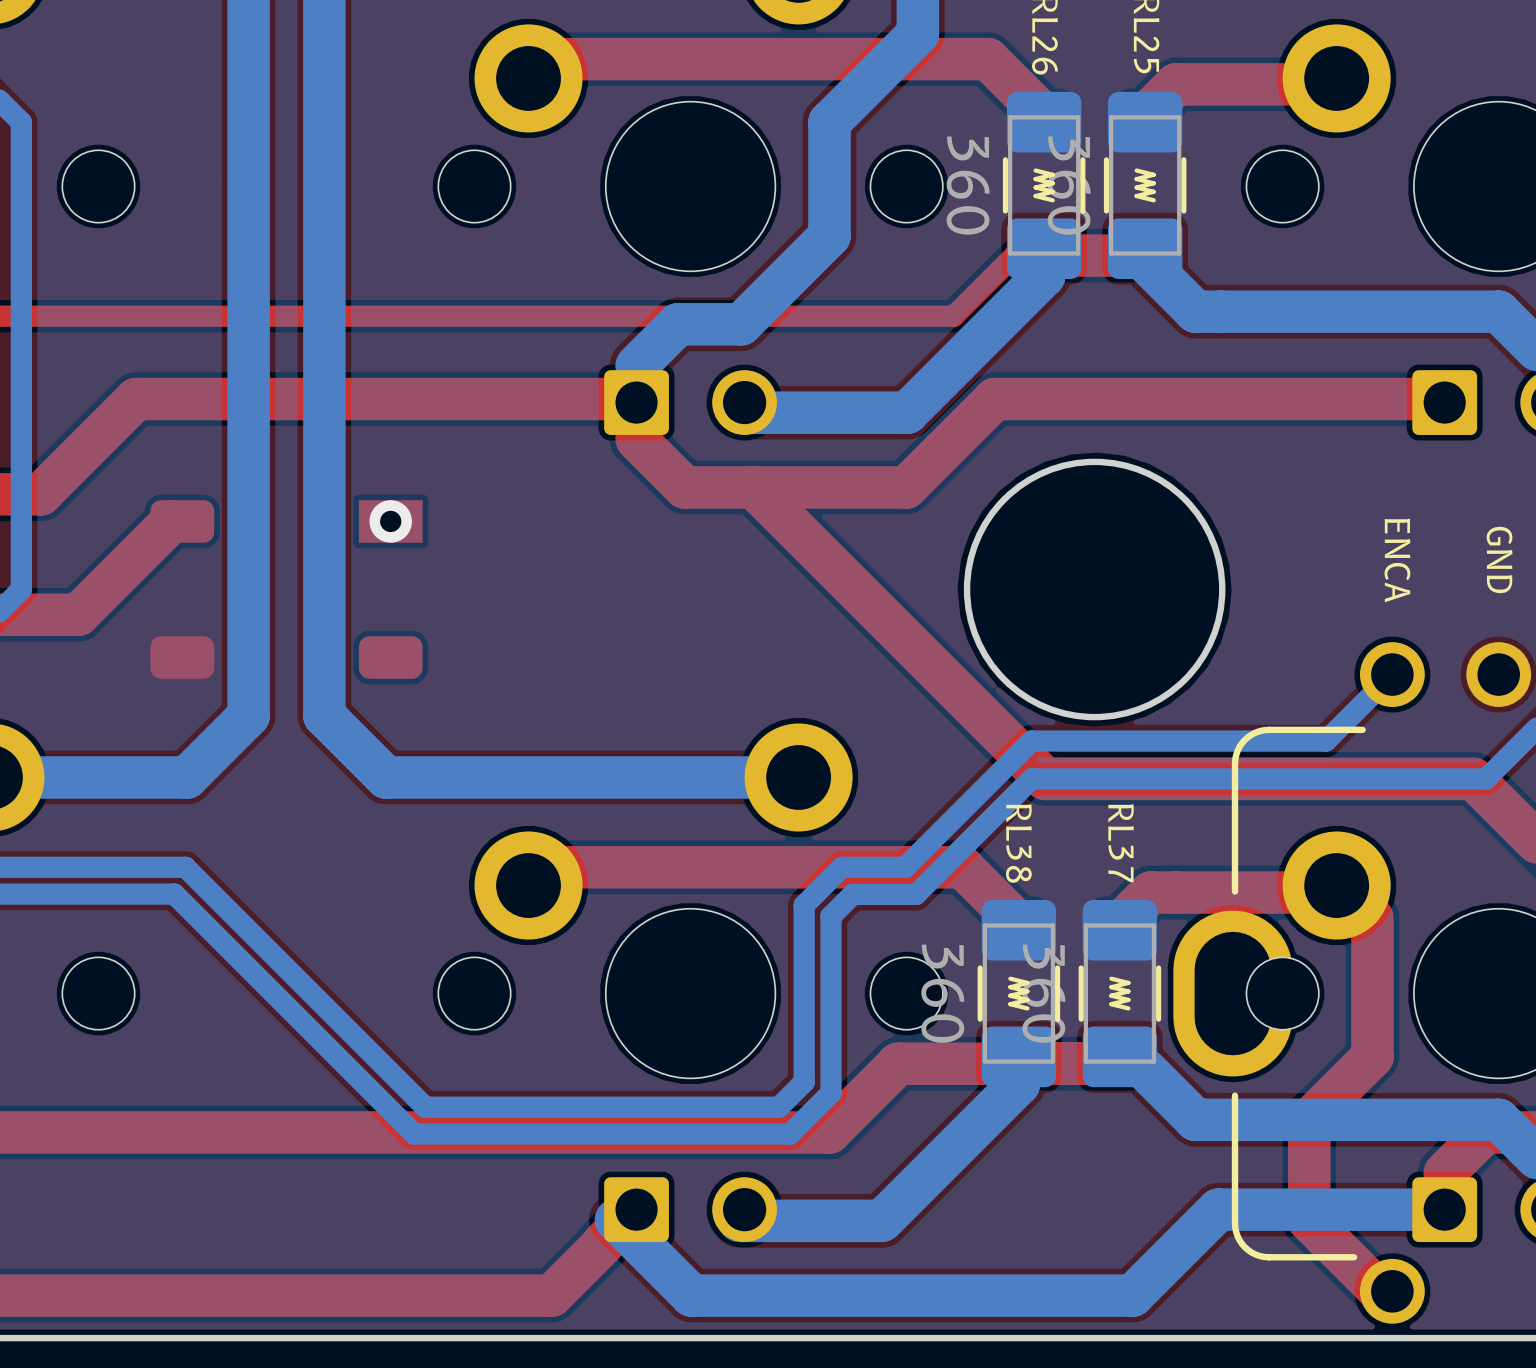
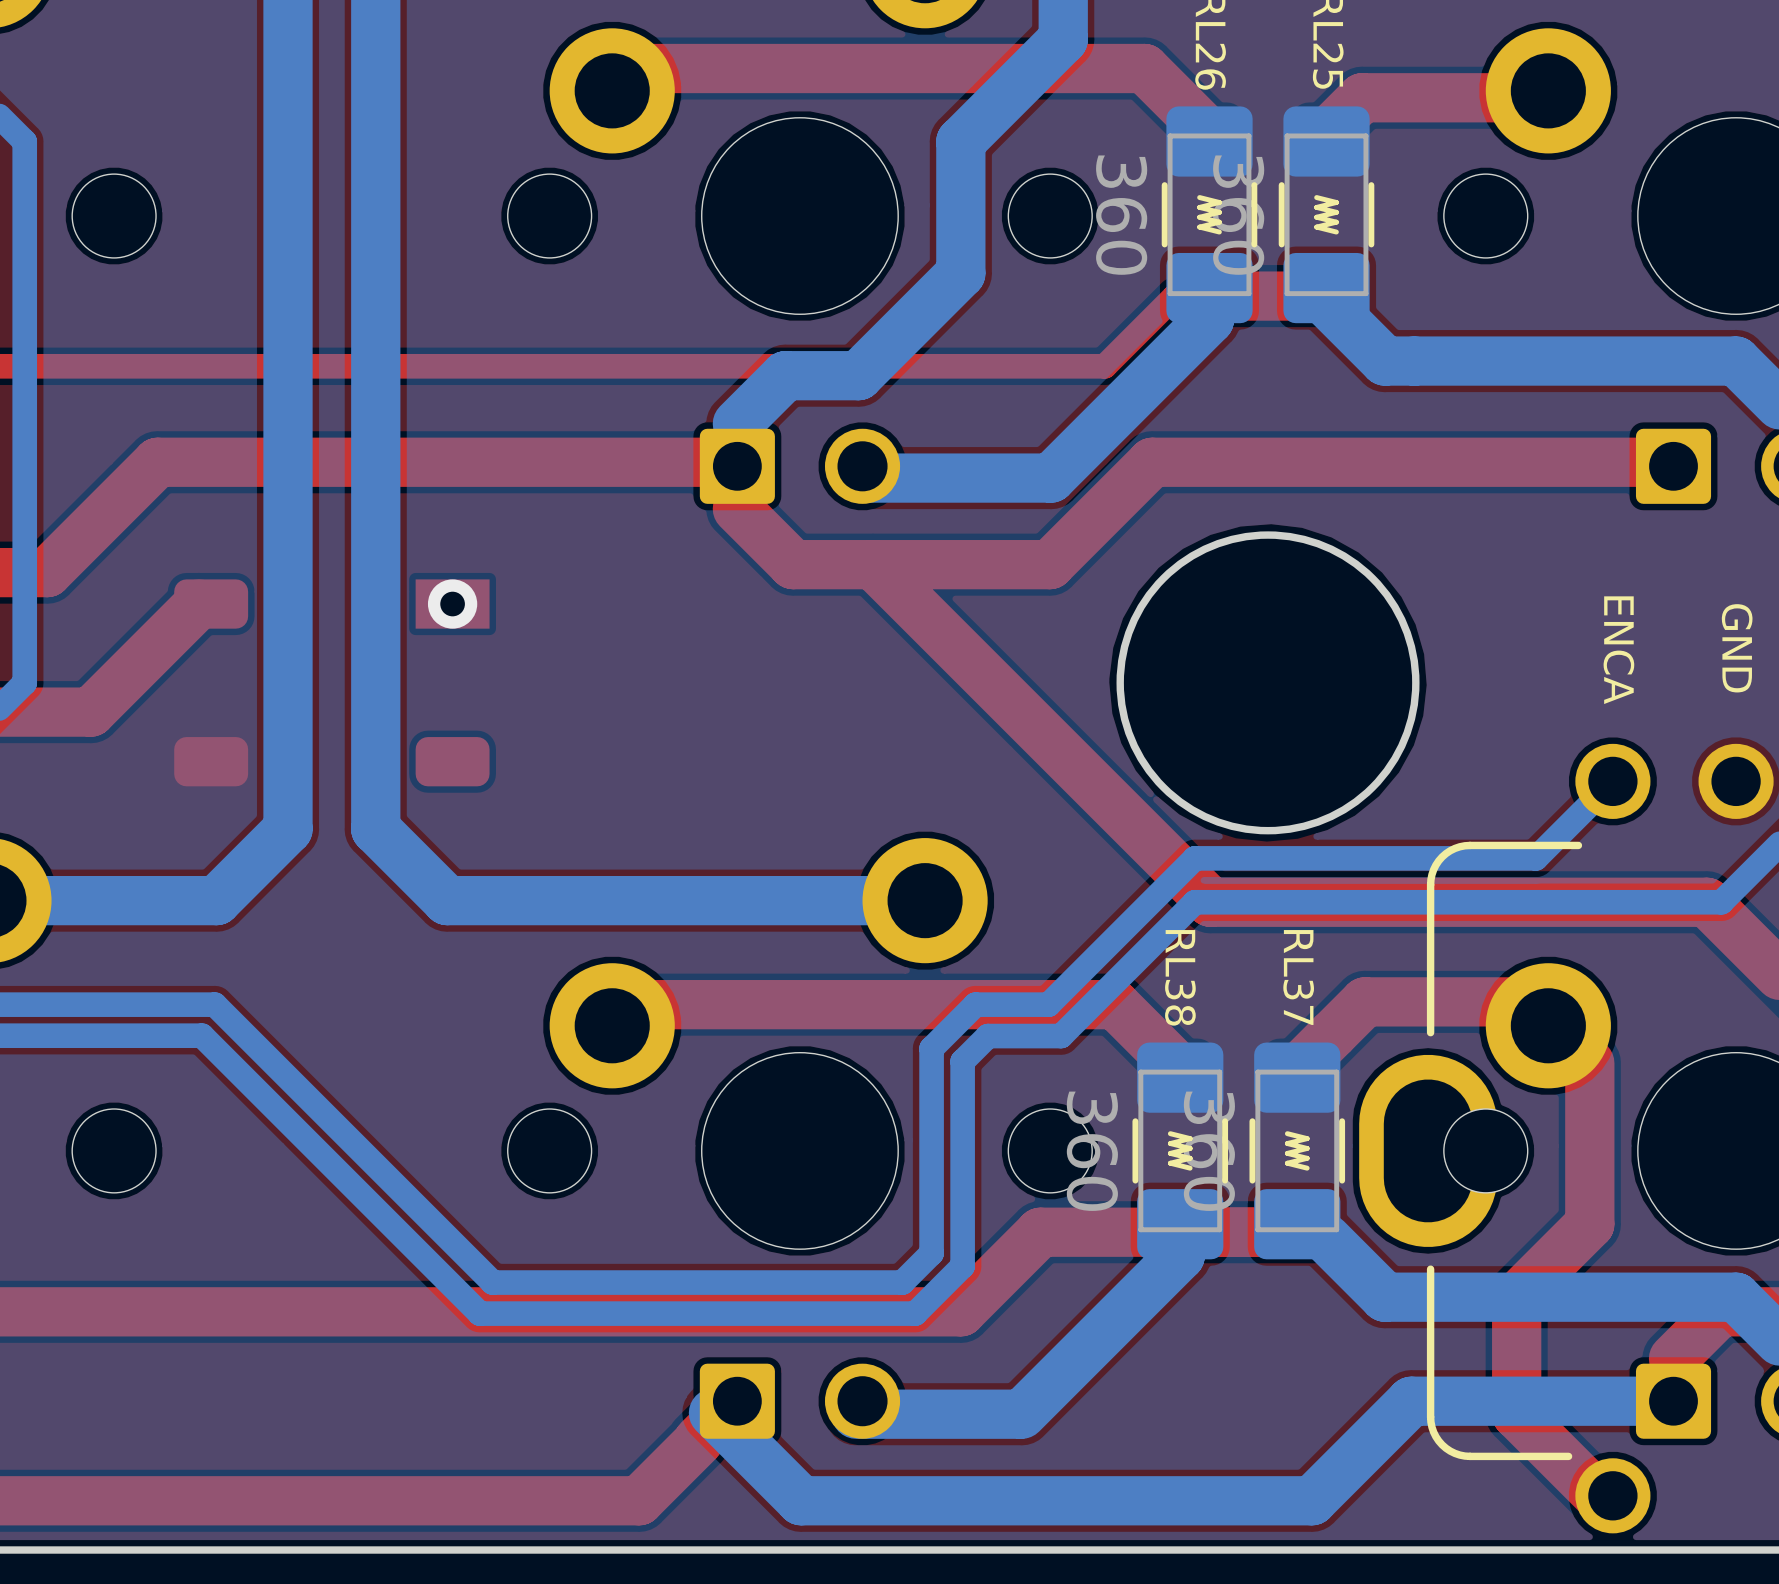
top track: (1321, 892) (1150, 892) -> (1551, 1001) (1365, 1001) (1332, 1033)

